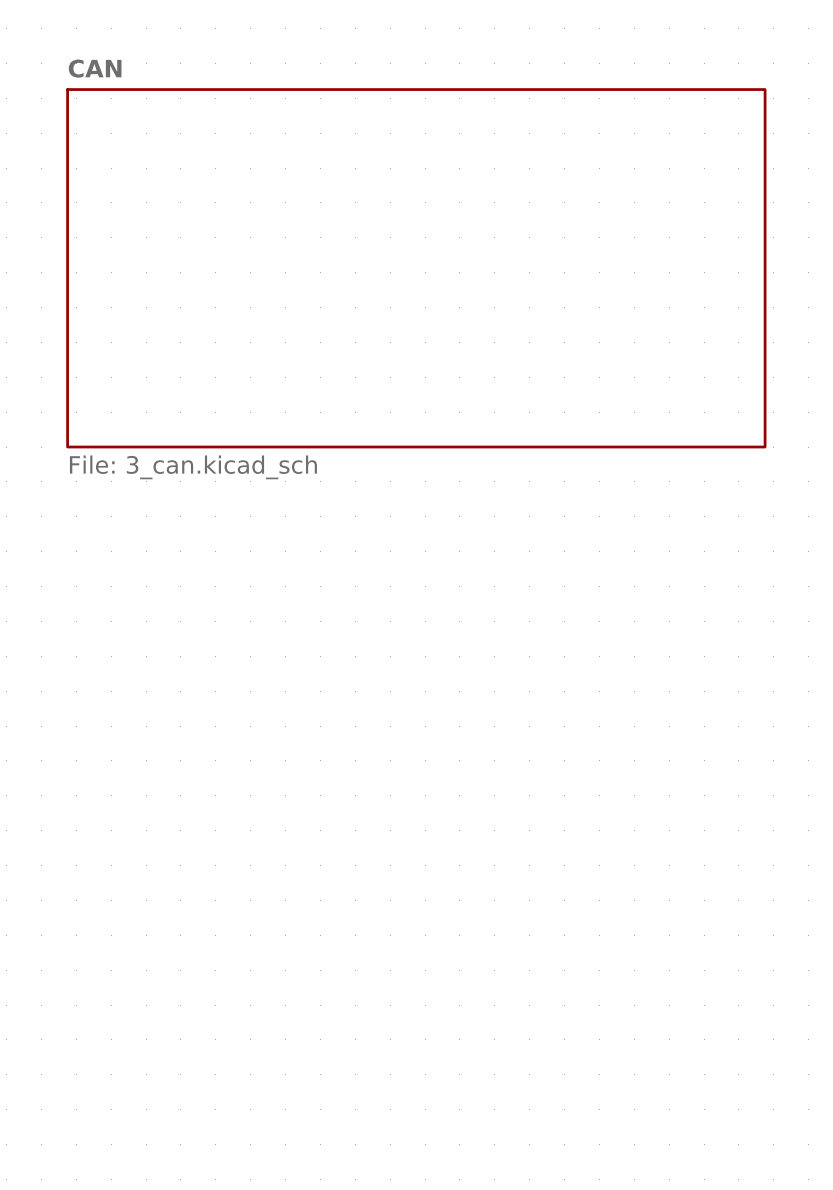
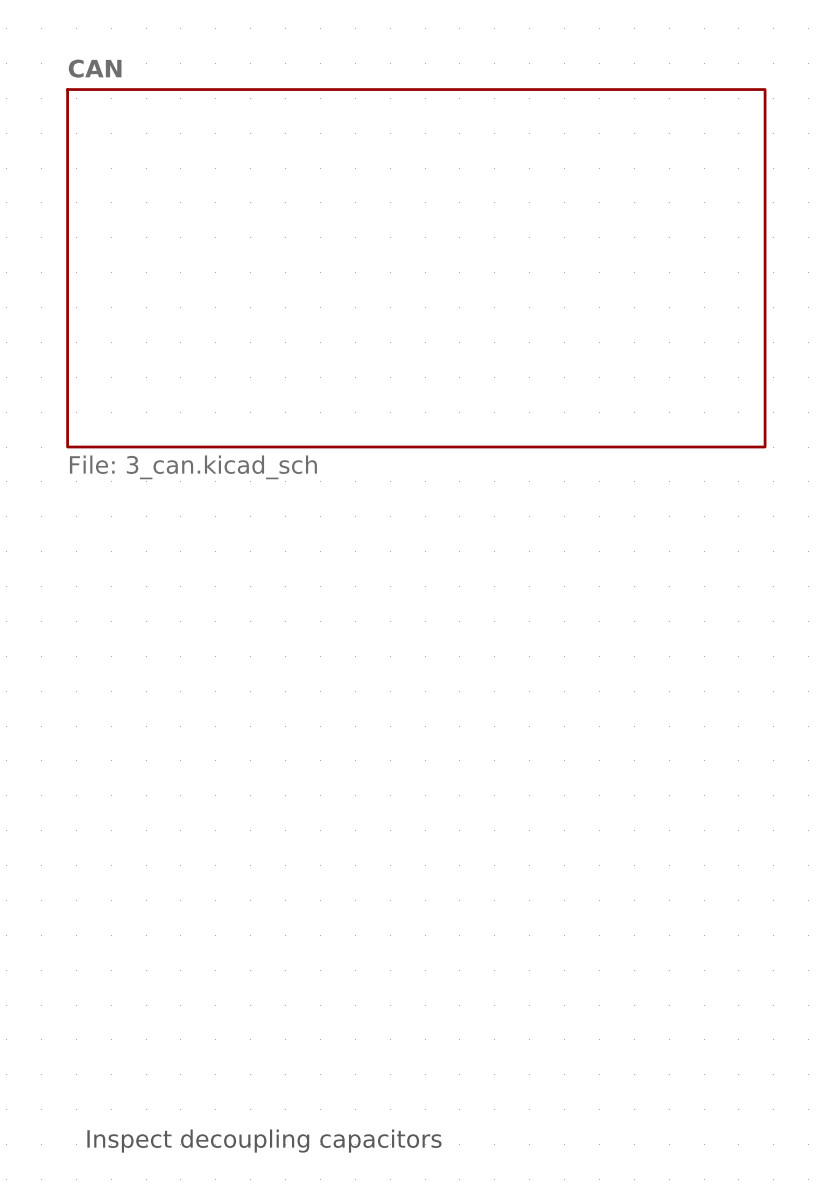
text: none -> Inspect decoupling capacitors (264, 1141)

